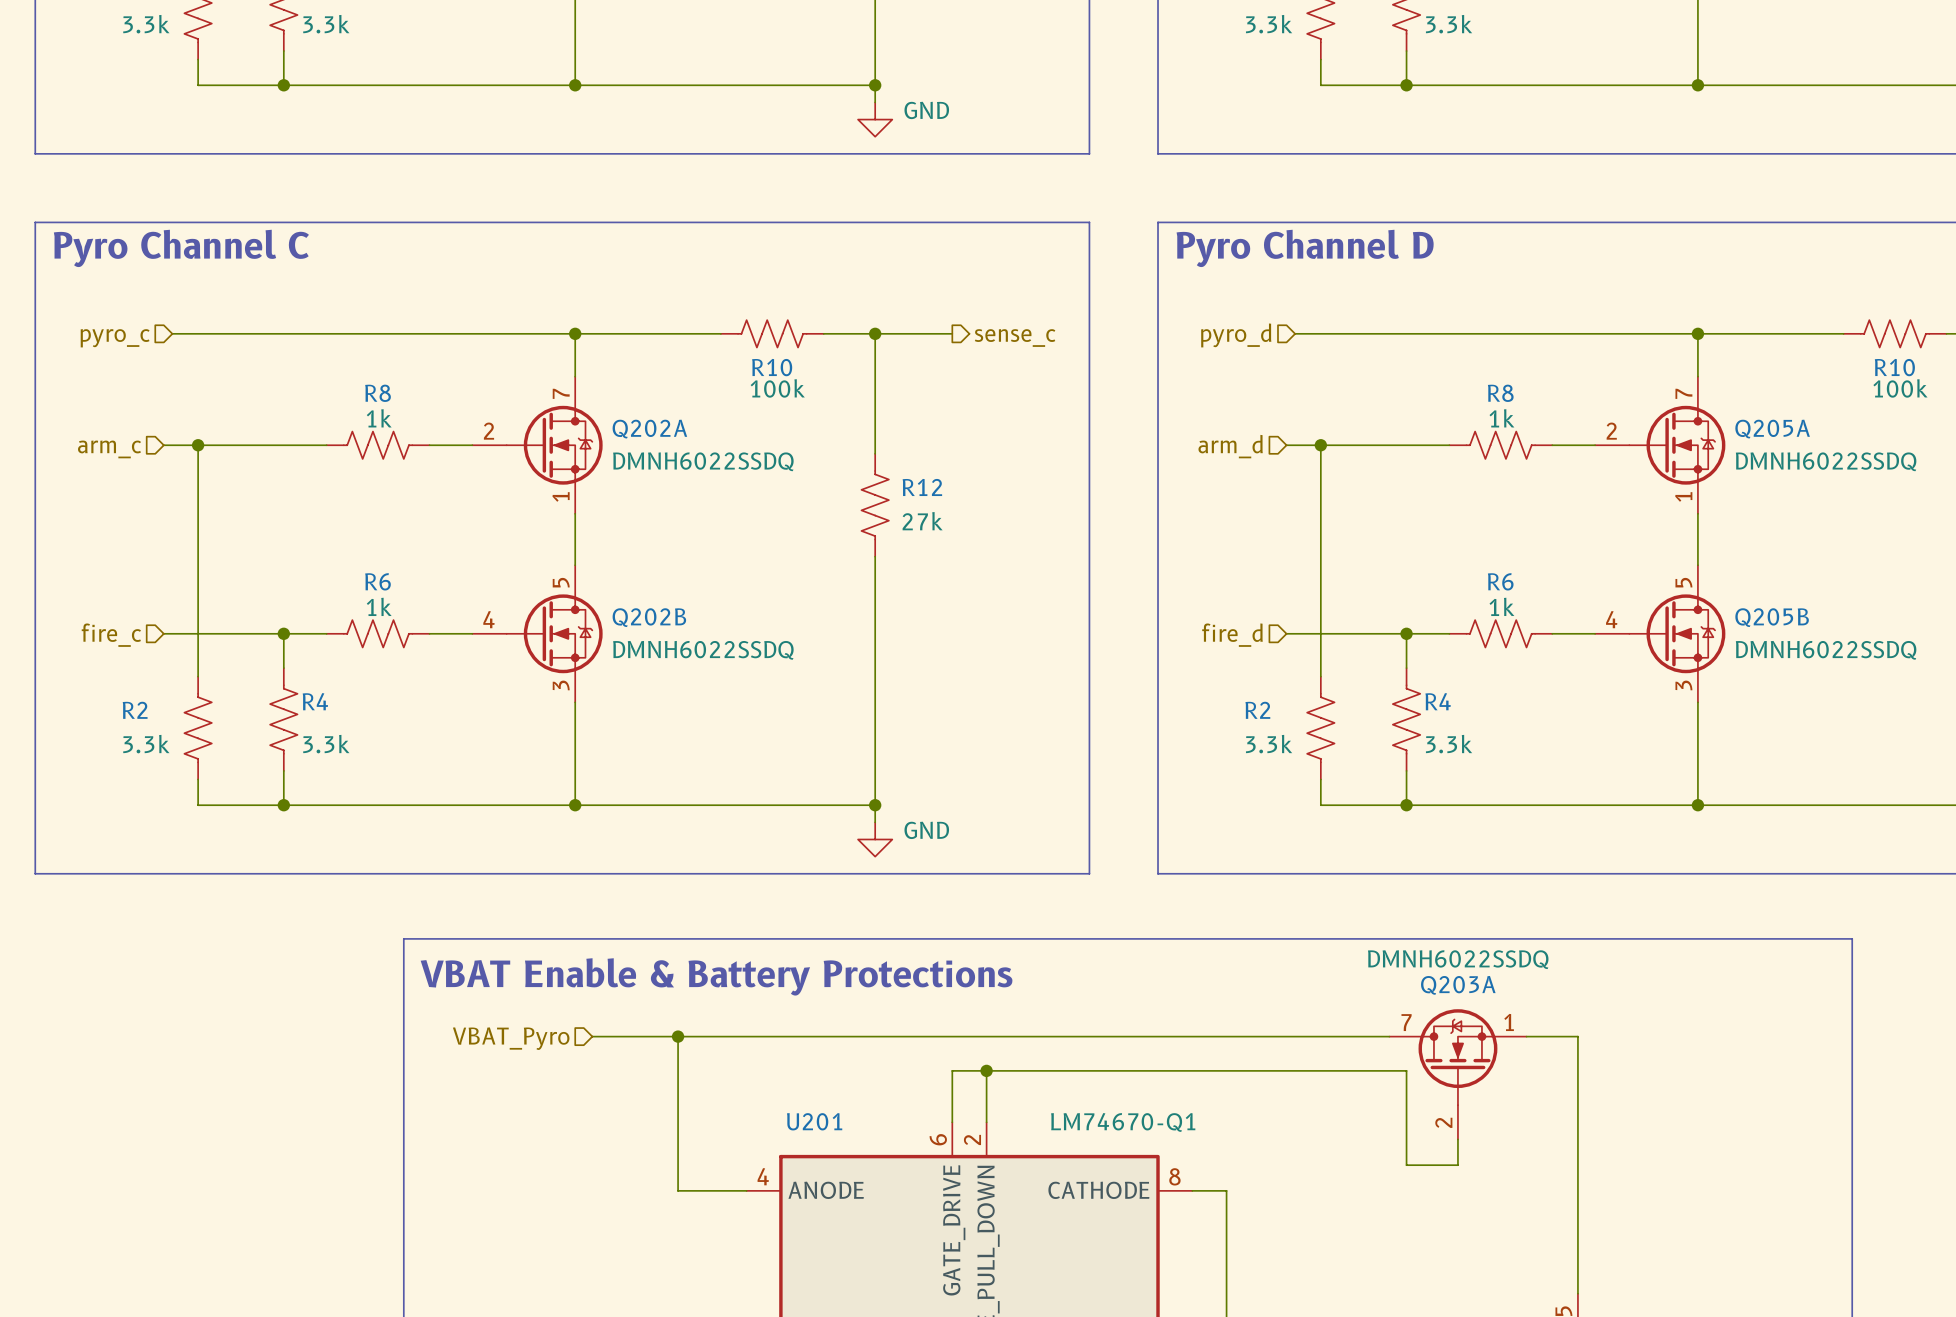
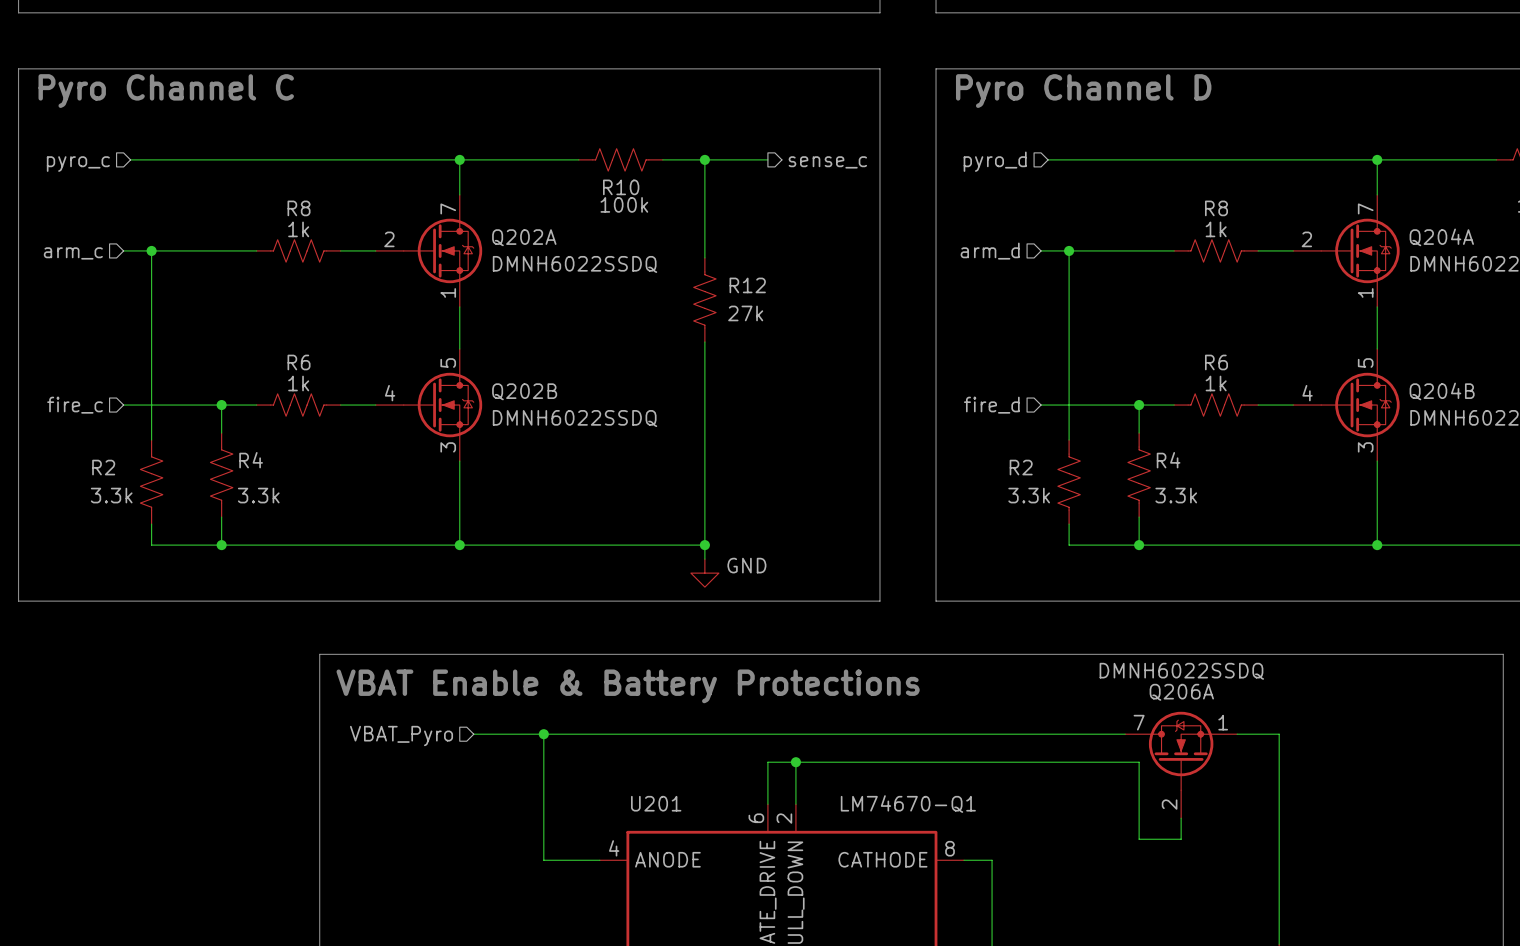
Q205A name: Q205A (1772, 429) -> Q204A (1441, 237)
Q205B name: Q205B (1772, 617) -> Q204B (1442, 391)
Q203A name: Q203A (1458, 985) -> Q206A (1181, 692)

